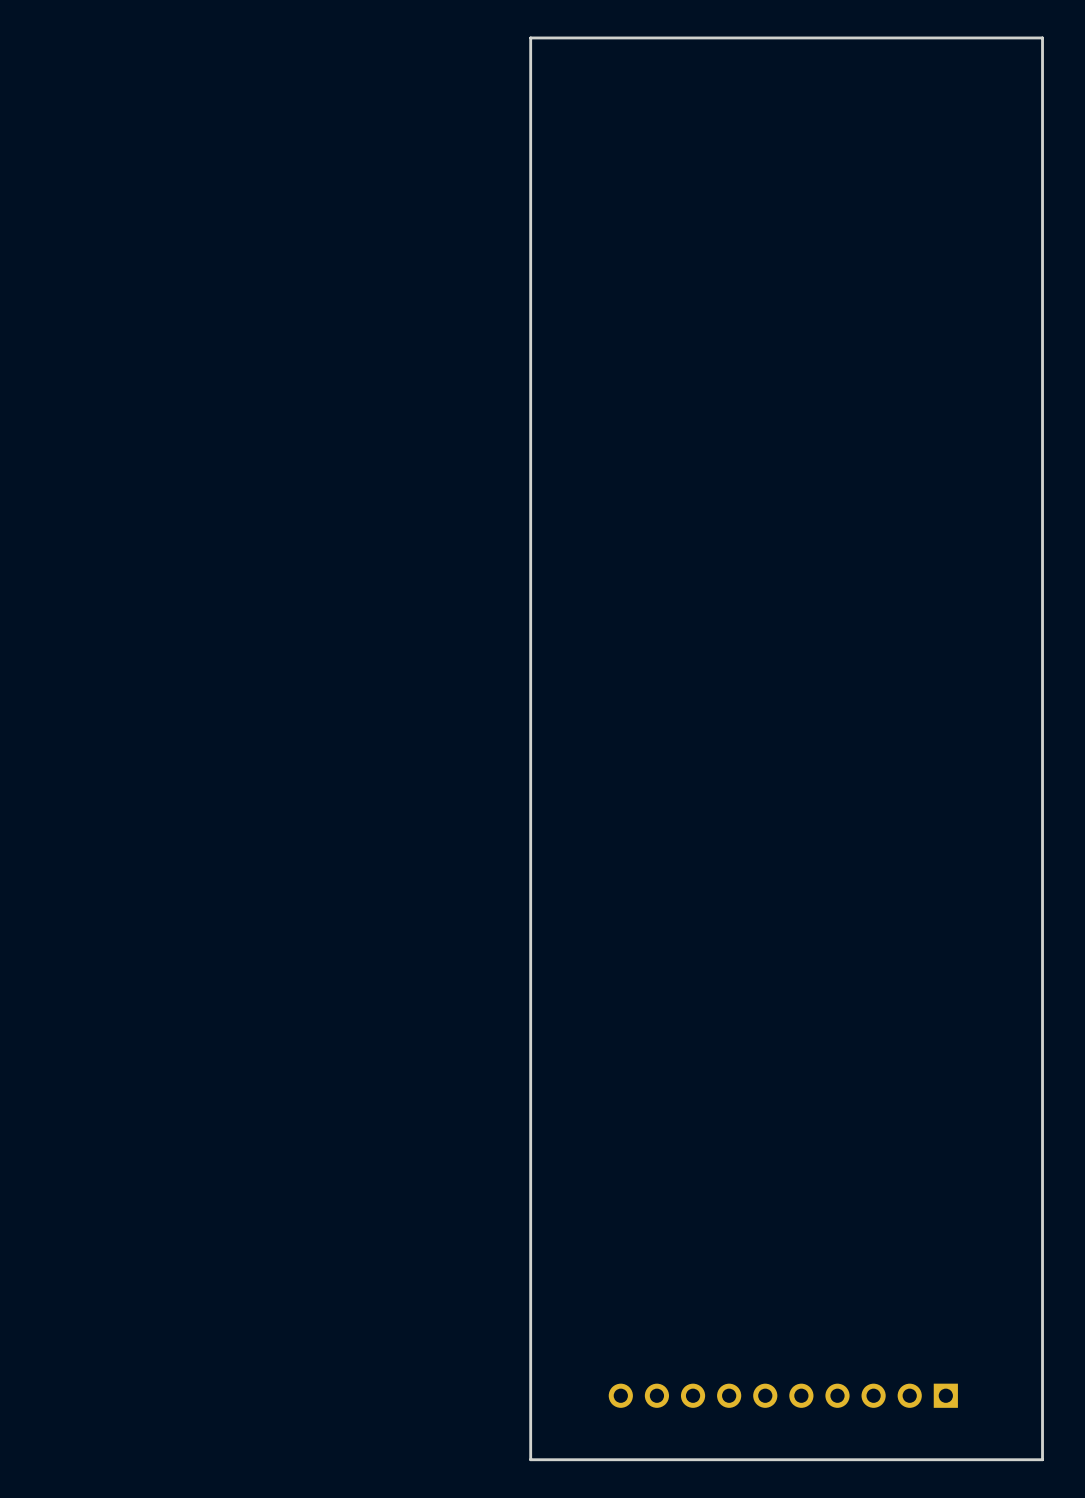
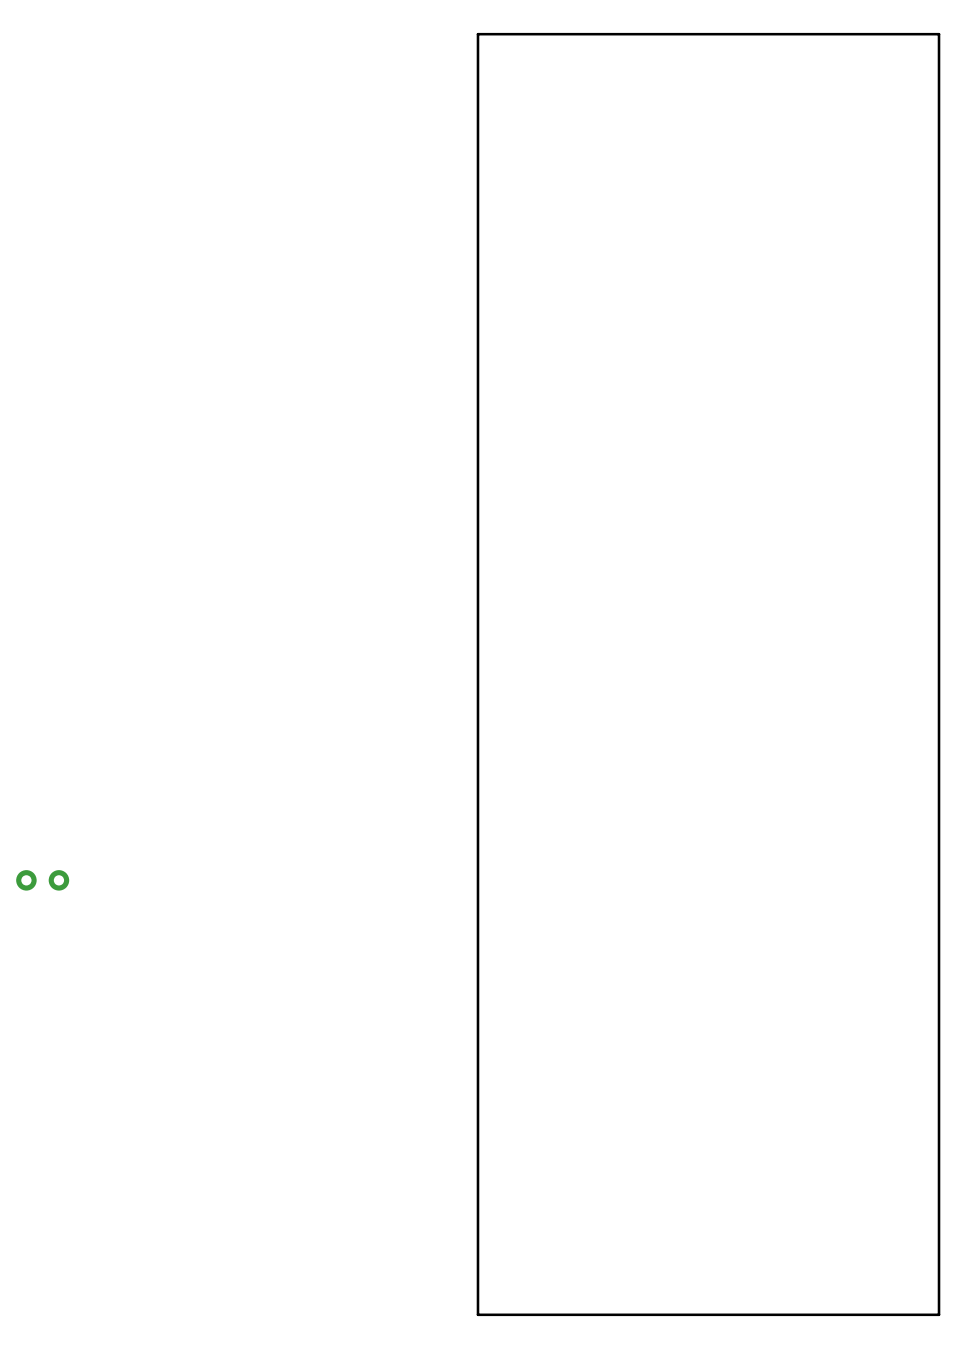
part: none -> (42, 880)
part: (783, 1395) -> none

